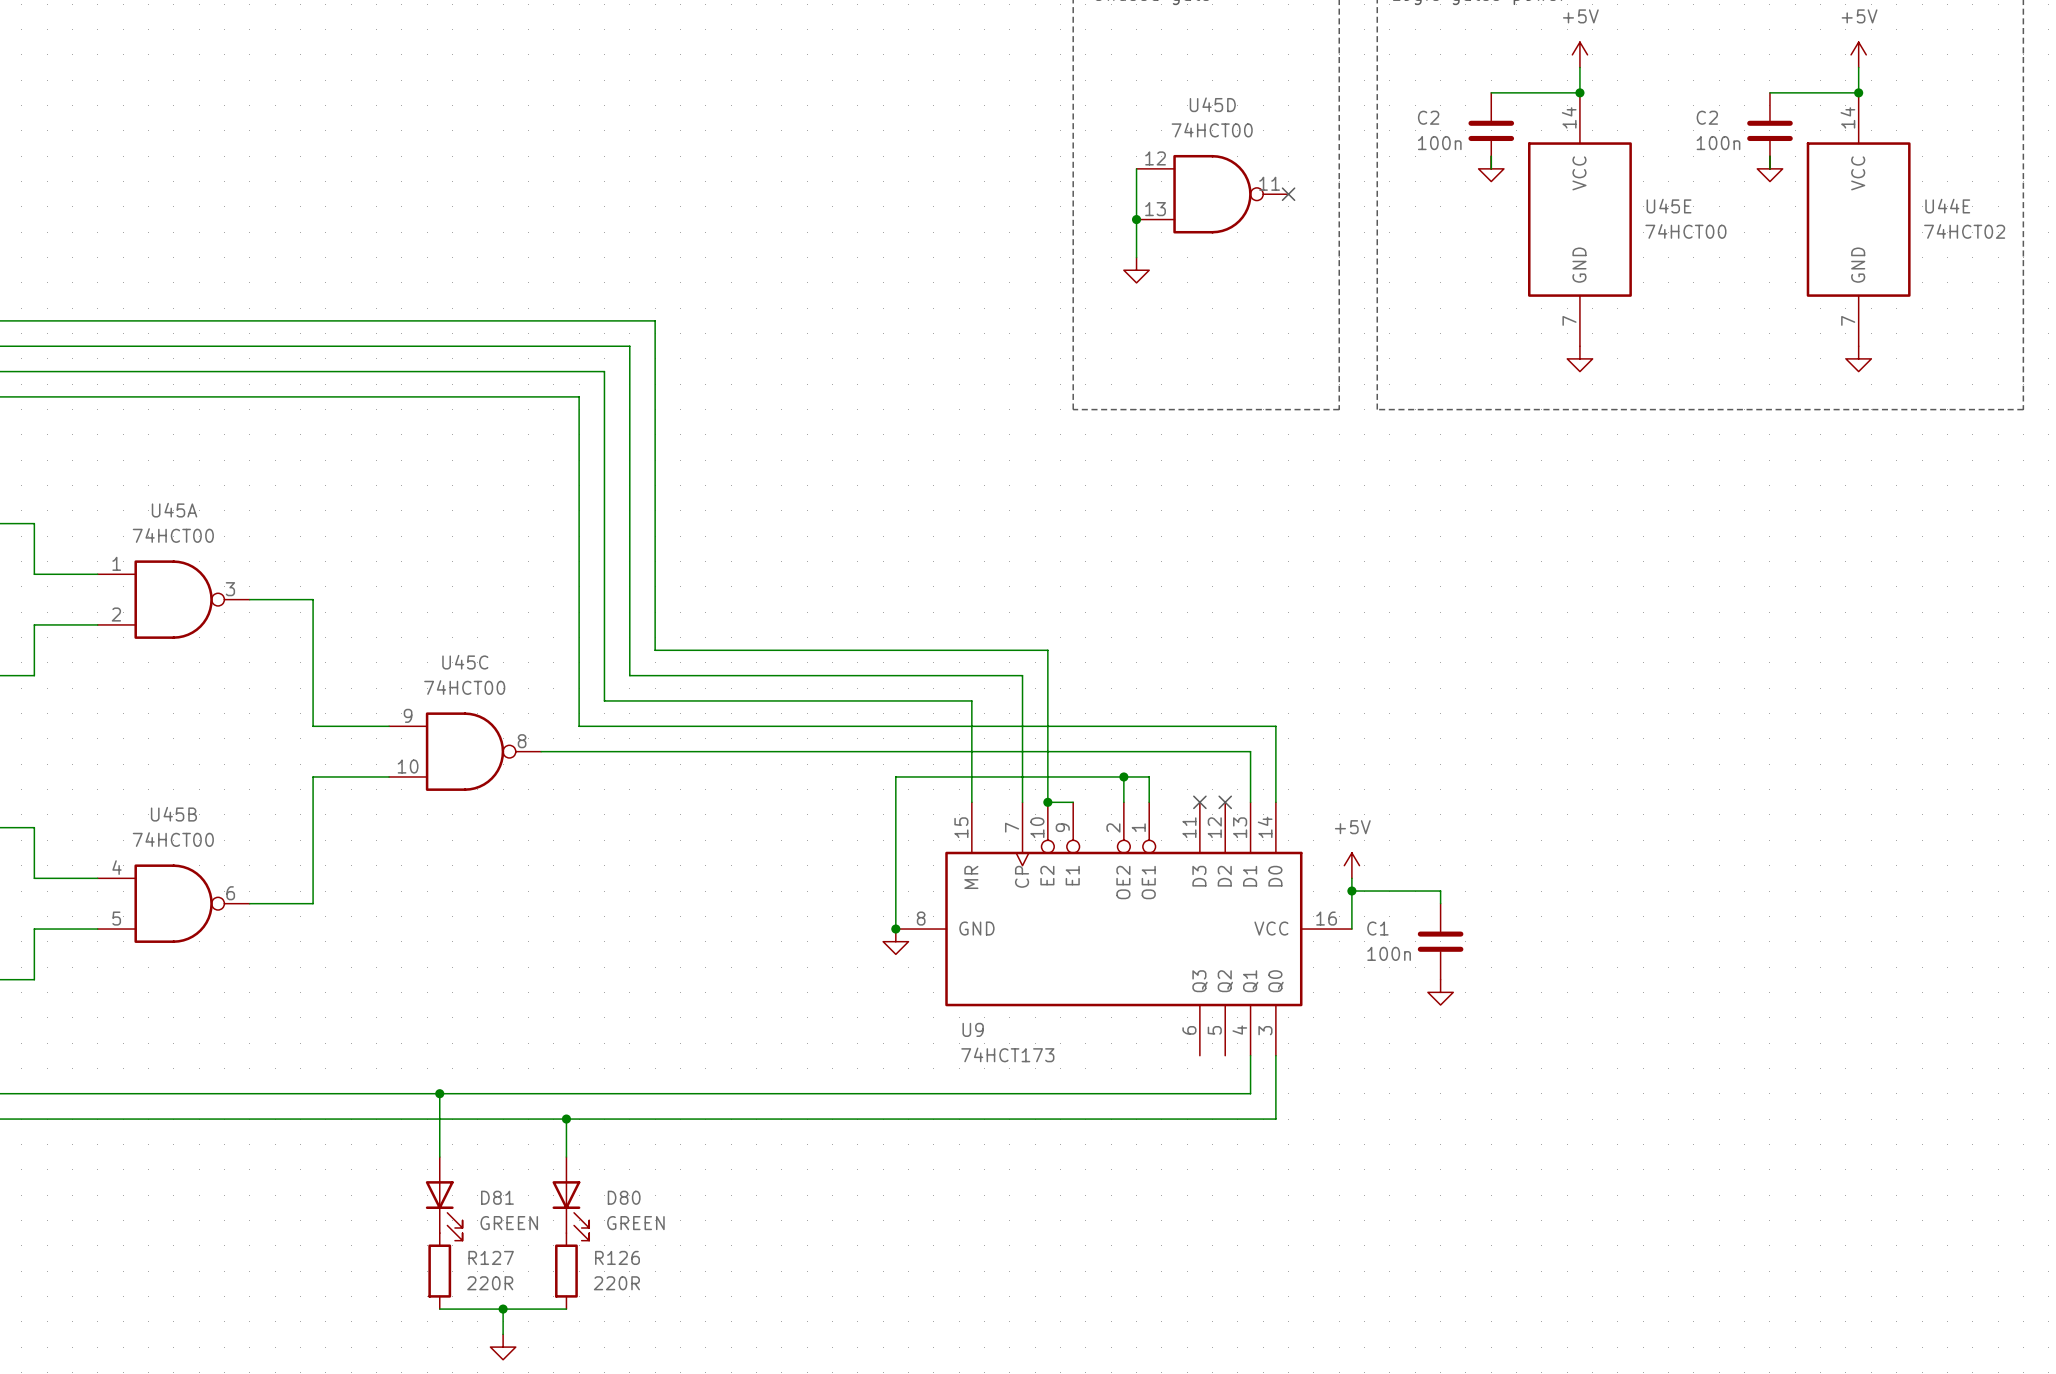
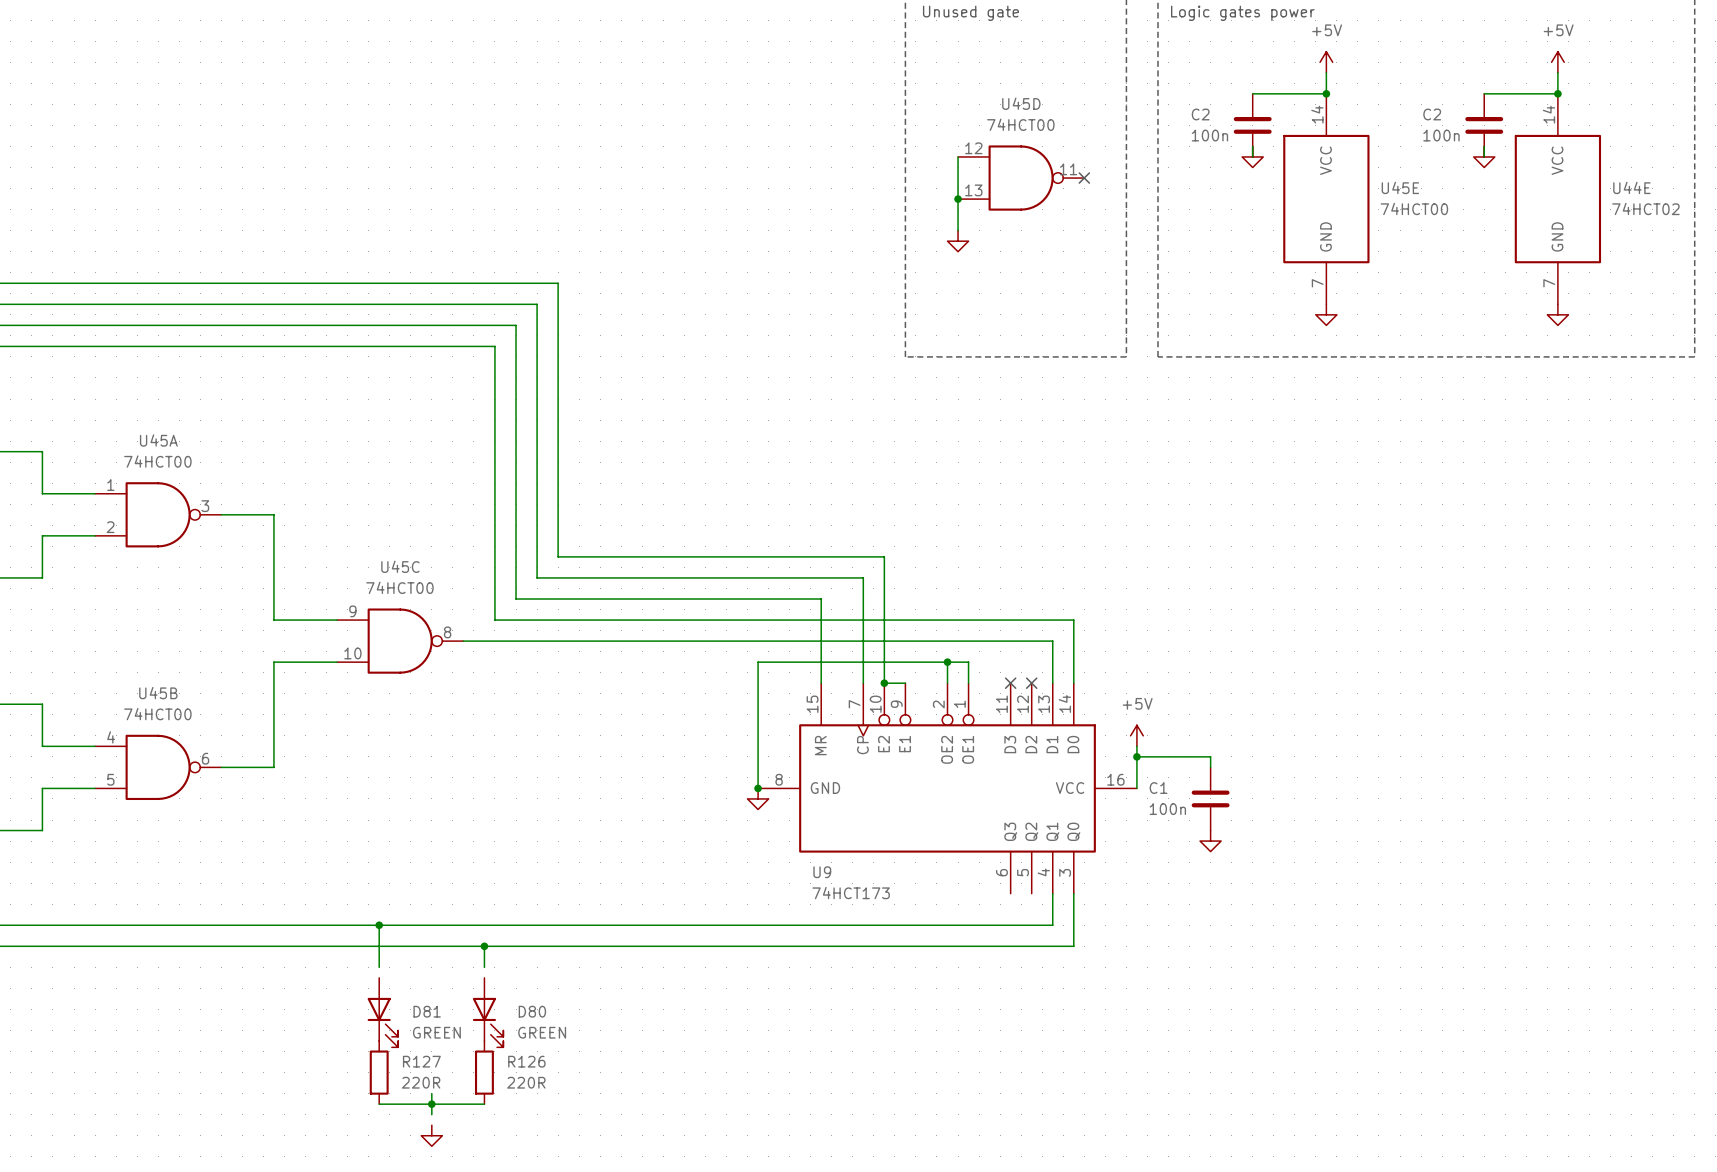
wire: (439, 1144) (439, 1157) -> none
wire: (566, 1144) (566, 1157) -> none
wire: (503, 1321) (503, 1334) -> (431, 1093) (431, 1104)

